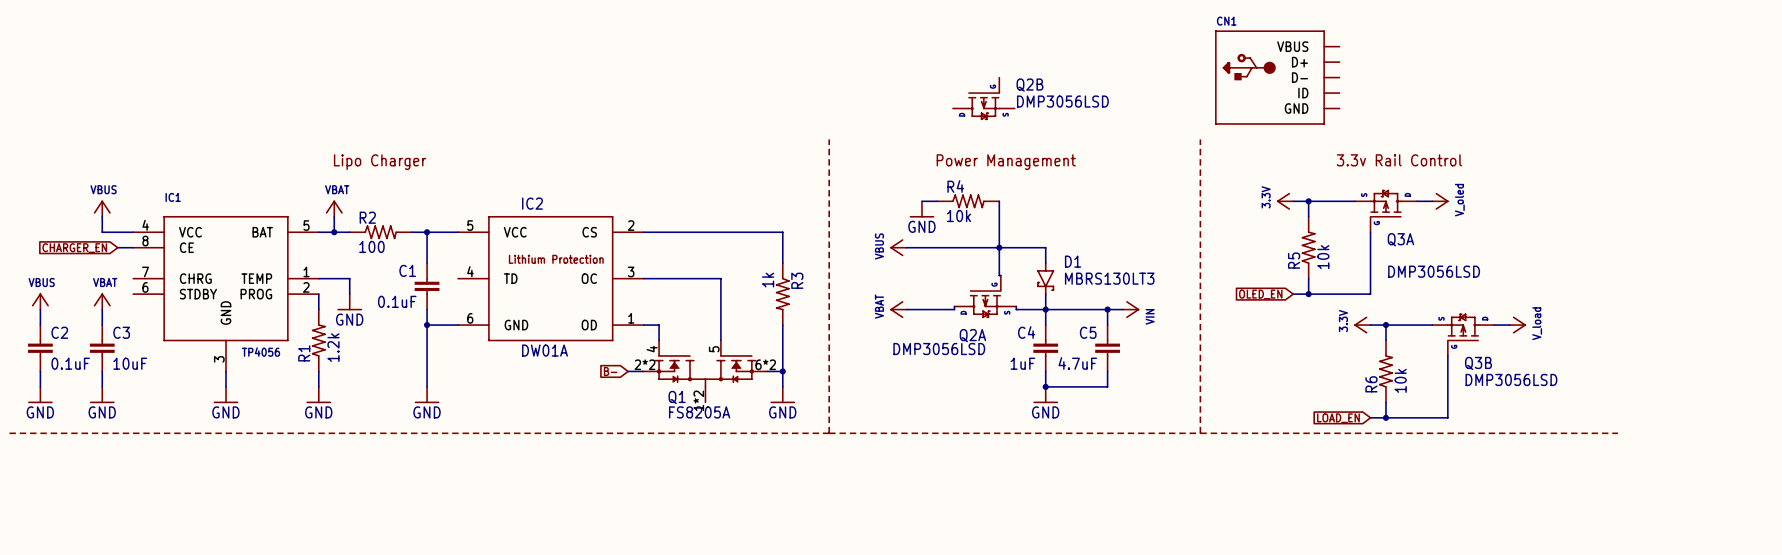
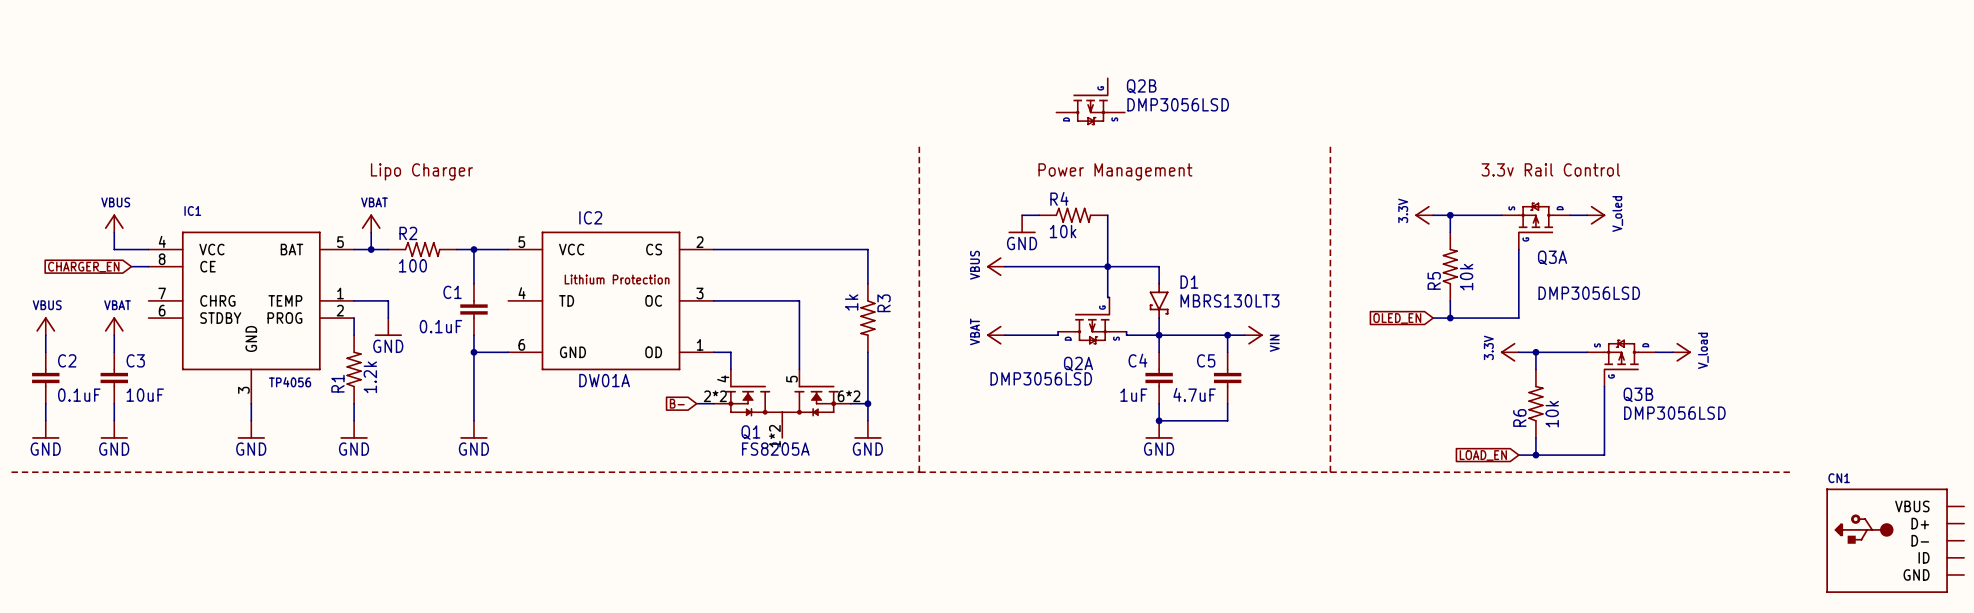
CN1 position: (1277, 77) -> (1895, 540)

